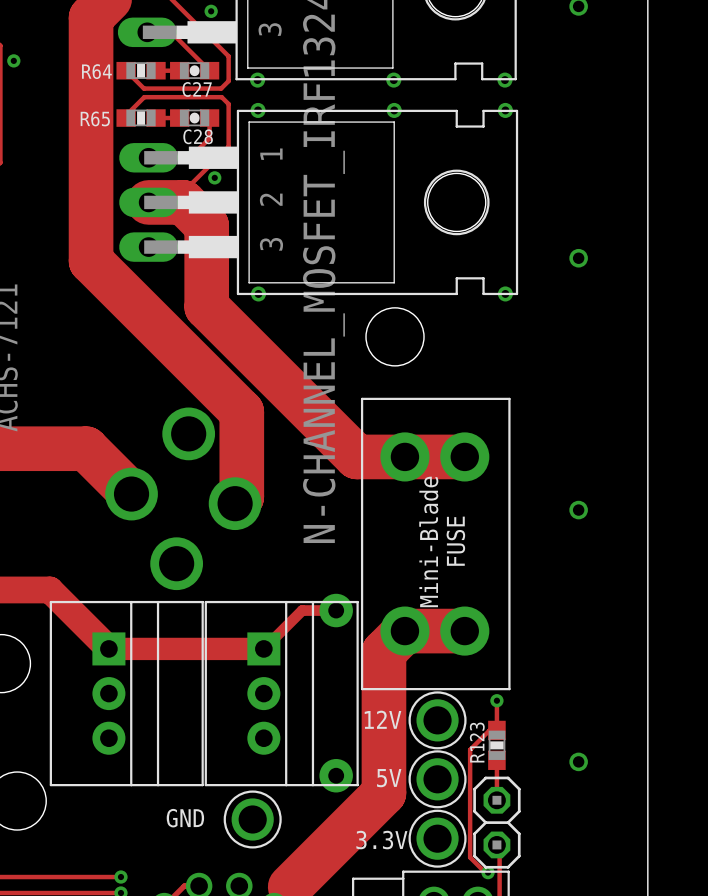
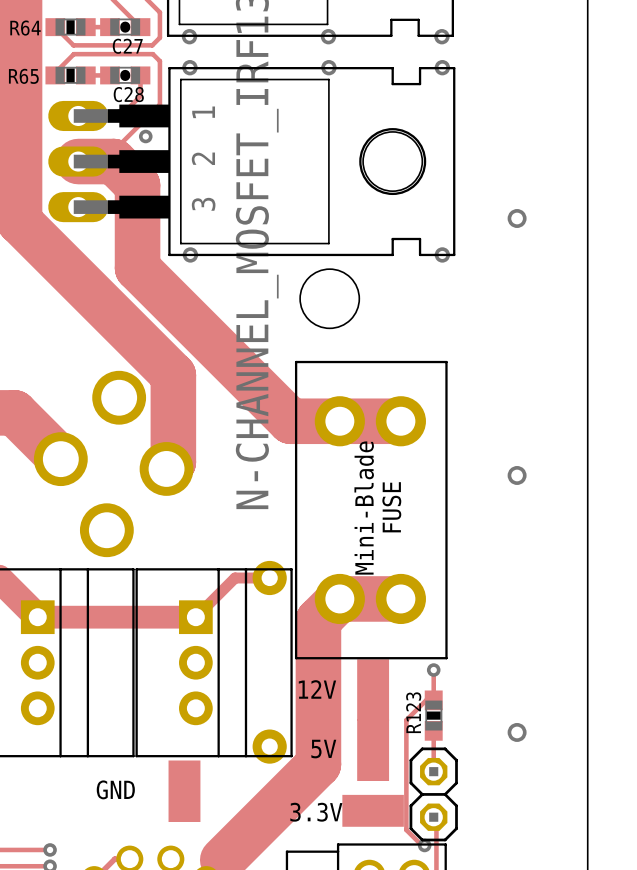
part footprint: [408, 691, 467, 750] -> [357, 659, 390, 721]
part footprint: [408, 750, 467, 809] -> [357, 719, 390, 781]
part footprint: [223, 790, 282, 849] -> [168, 760, 201, 822]
part footprint: [408, 809, 467, 868] -> [342, 794, 404, 827]

